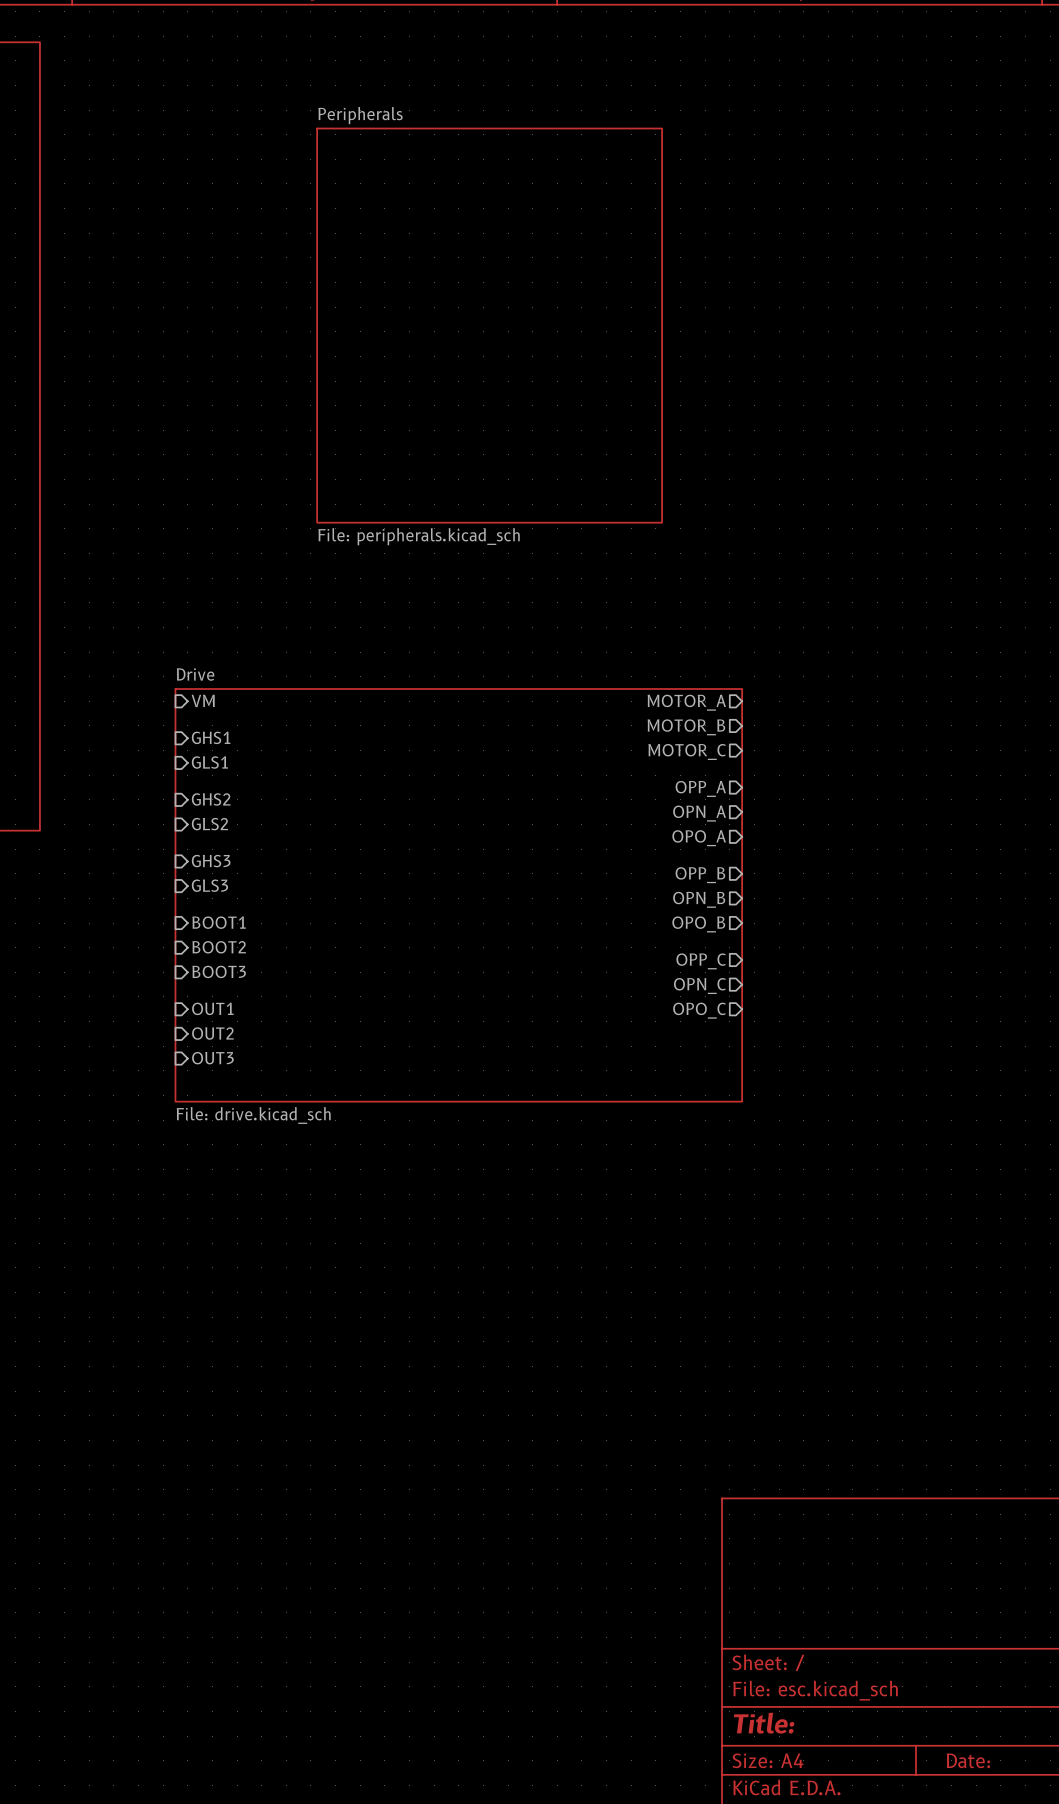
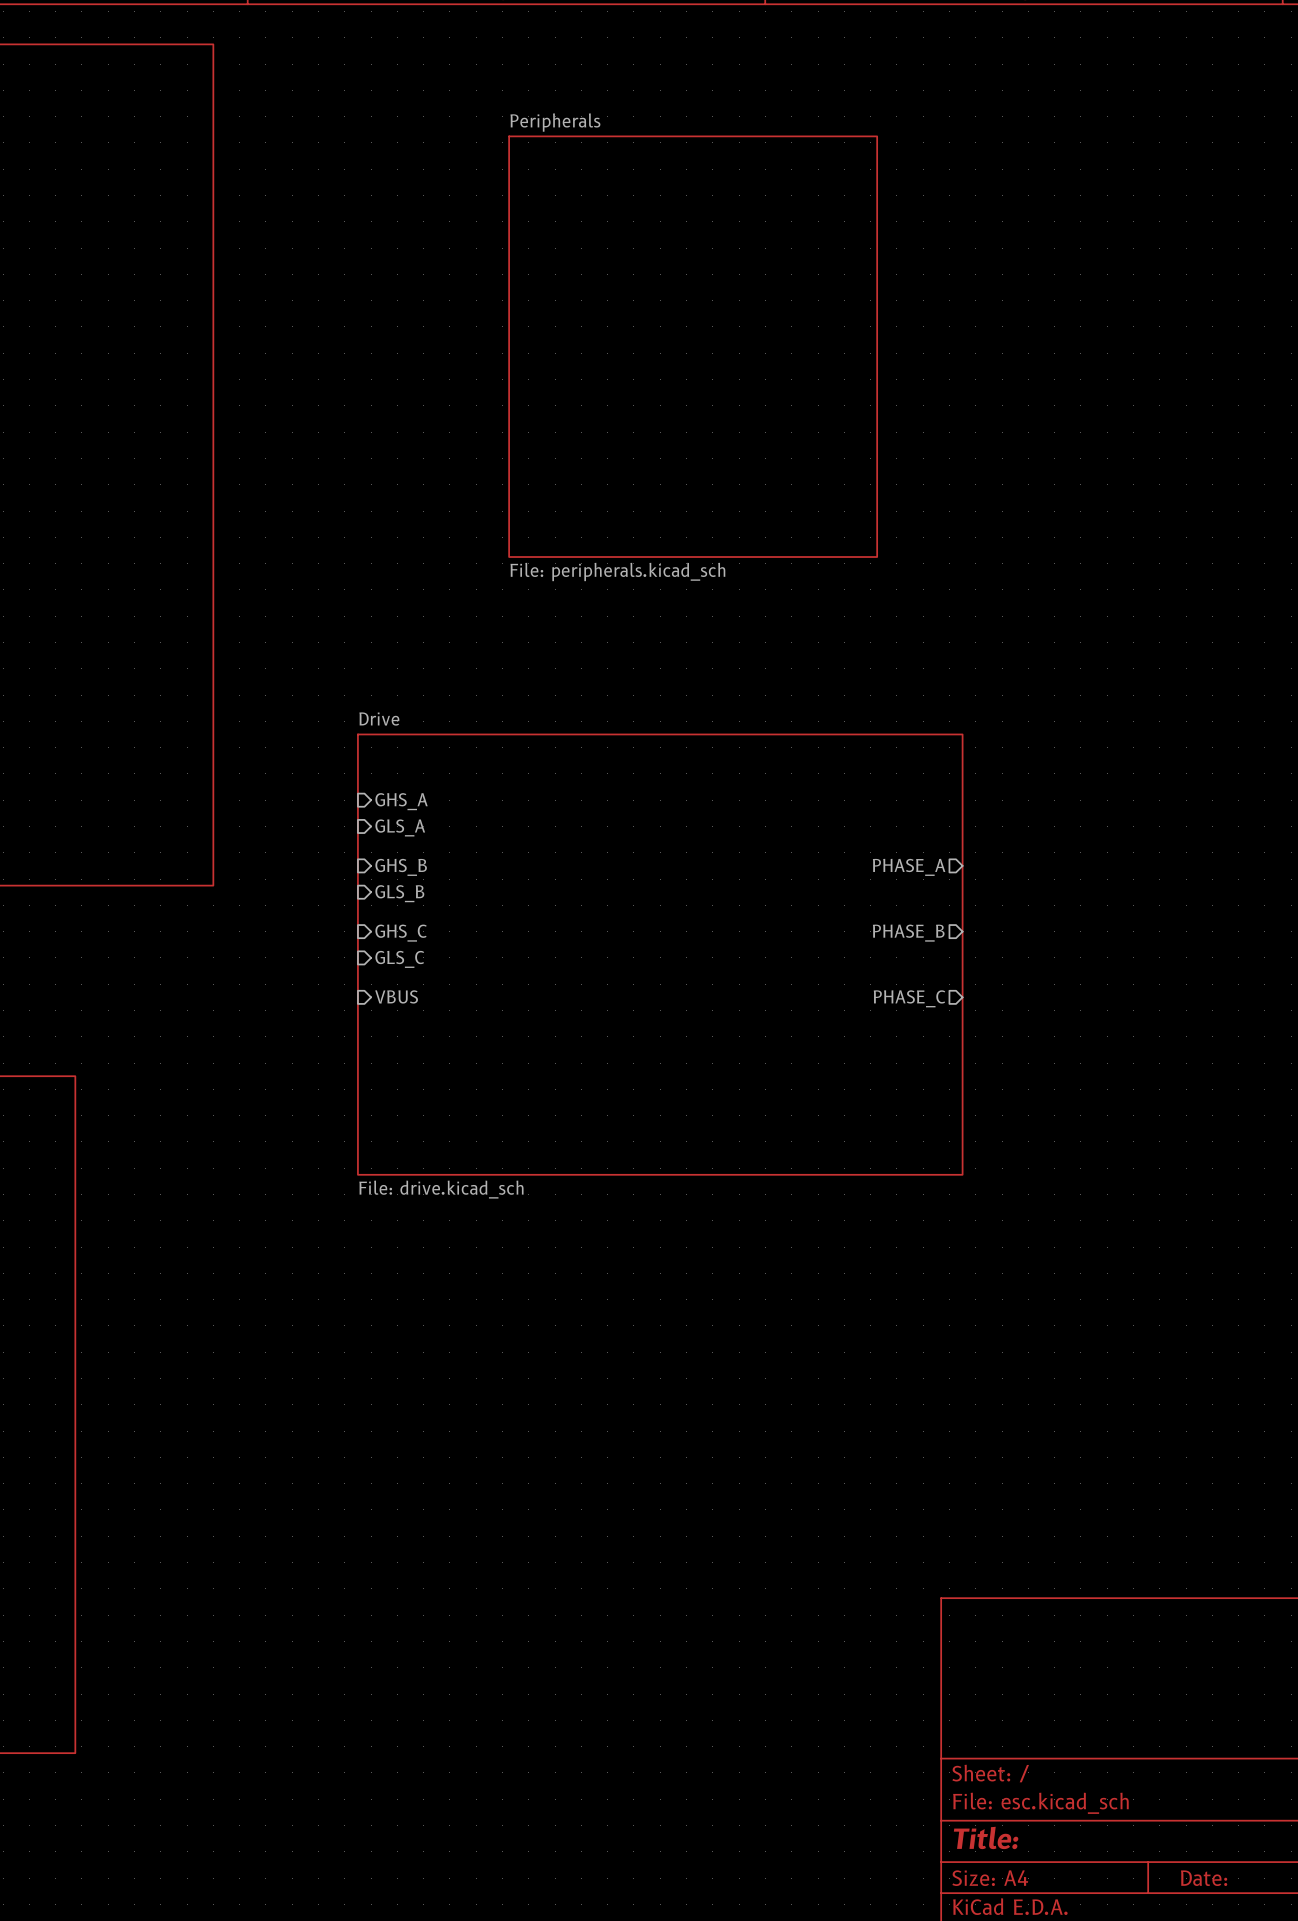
sheet pin: VM (203, 700) -> none
sheet pin: MOTOR_A (686, 702) -> none
sheet pin: MOTOR_B (686, 727) -> none
sheet pin: GHS1 (211, 737) -> GHS_A (401, 801)
sheet pin: MOTOR_C (687, 751) -> none
sheet pin: GLS1 (209, 762) -> GLS_A (400, 827)
sheet pin: OPP_A (700, 788) -> none
sheet pin: GHS2 (211, 799) -> GHS_B (401, 867)
sheet pin: OPN_A (699, 813) -> PHASE_A (909, 867)
sheet pin: GLS2 (209, 824) -> GLS_B (399, 893)
sheet pin: OPO_A (699, 838) -> none
sheet pin: GHS3 (211, 861) -> GHS_C (401, 933)
sheet pin: OPP_B (700, 875) -> PHASE_B (908, 933)
sheet pin: GLS3 (209, 885) -> GLS_C (399, 959)
sheet pin: OPN_B (699, 899) -> none
sheet pin: BOOT1 (219, 922) -> none
sheet pin: OPO_B (698, 924) -> none
sheet pin: none -> VBUS (396, 996)
sheet pin: none -> PHASE_C (909, 998)
sheet pin: BOOT2 (219, 947) -> none
sheet pin: OPP_C (701, 961) -> none
sheet pin: BOOT3 (219, 971) -> none
sheet pin: OPN_C (699, 986) -> none
sheet pin: OUT1 (212, 1008) -> none
sheet pin: OPO_C (699, 1010) -> none
sheet pin: OUT2 (212, 1033) -> none
sheet pin: OUT3 (212, 1058) -> none

